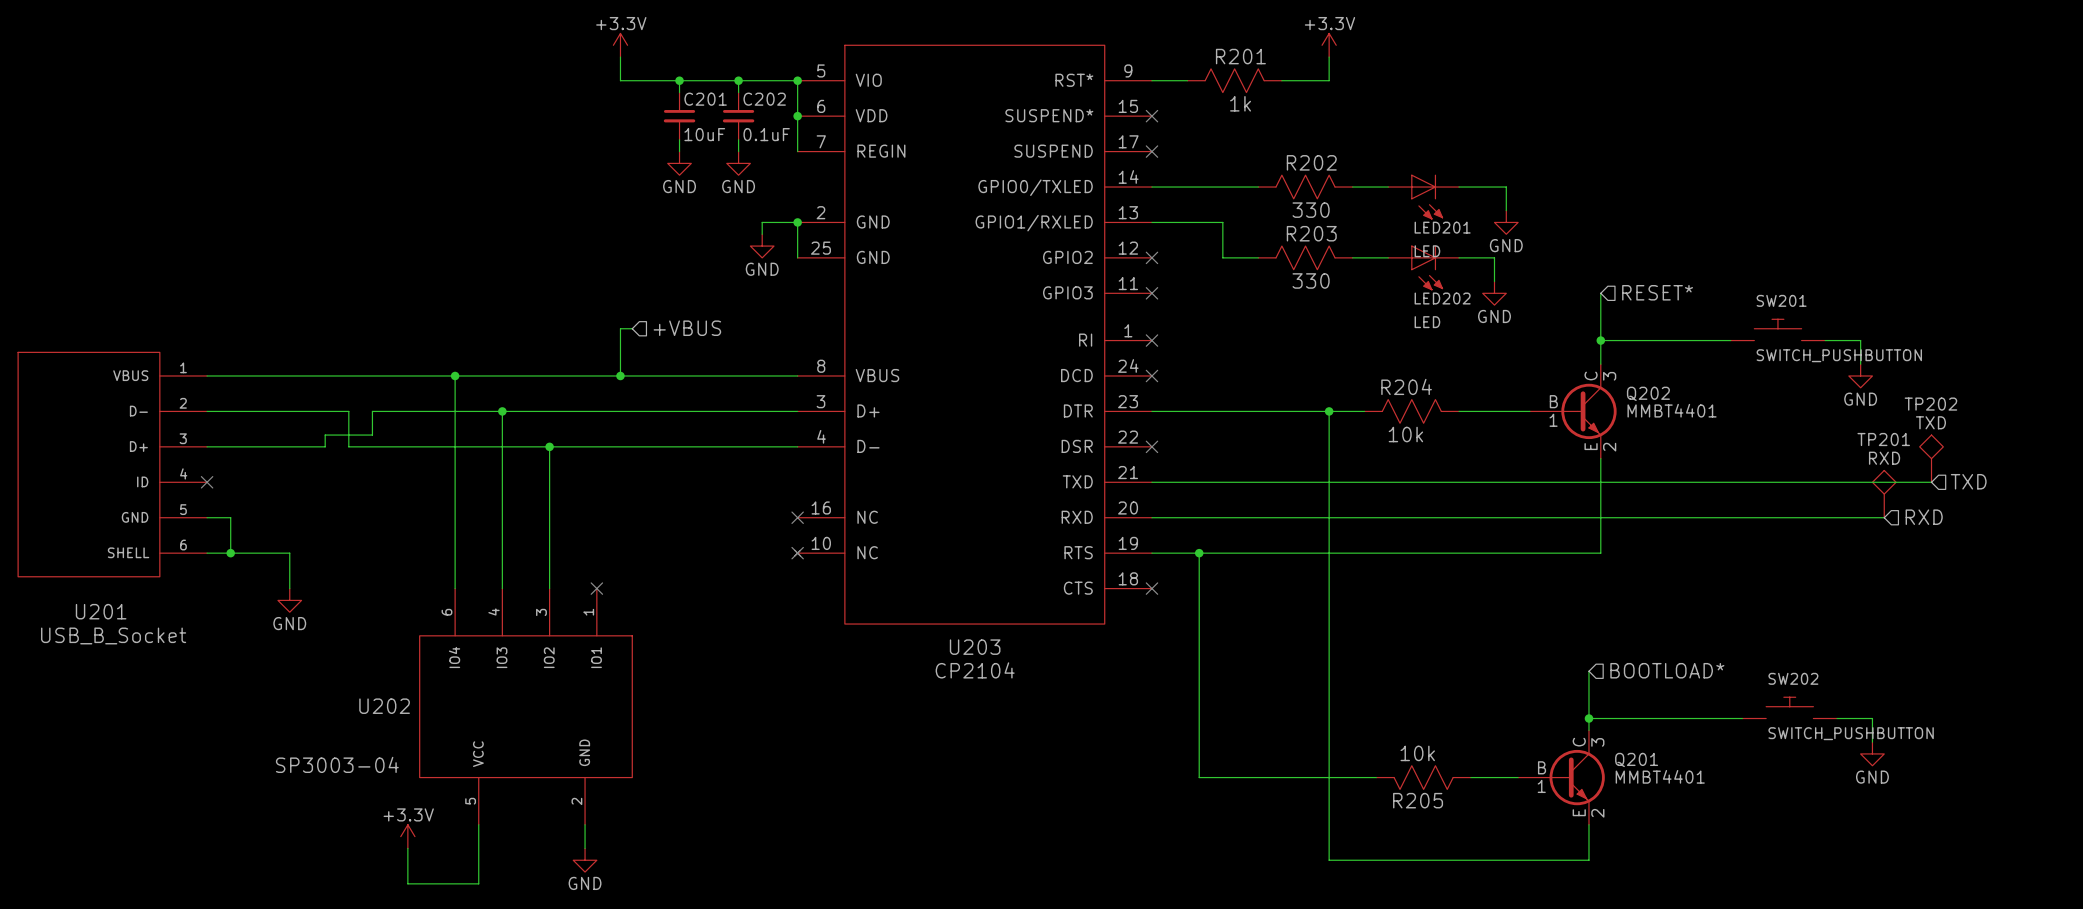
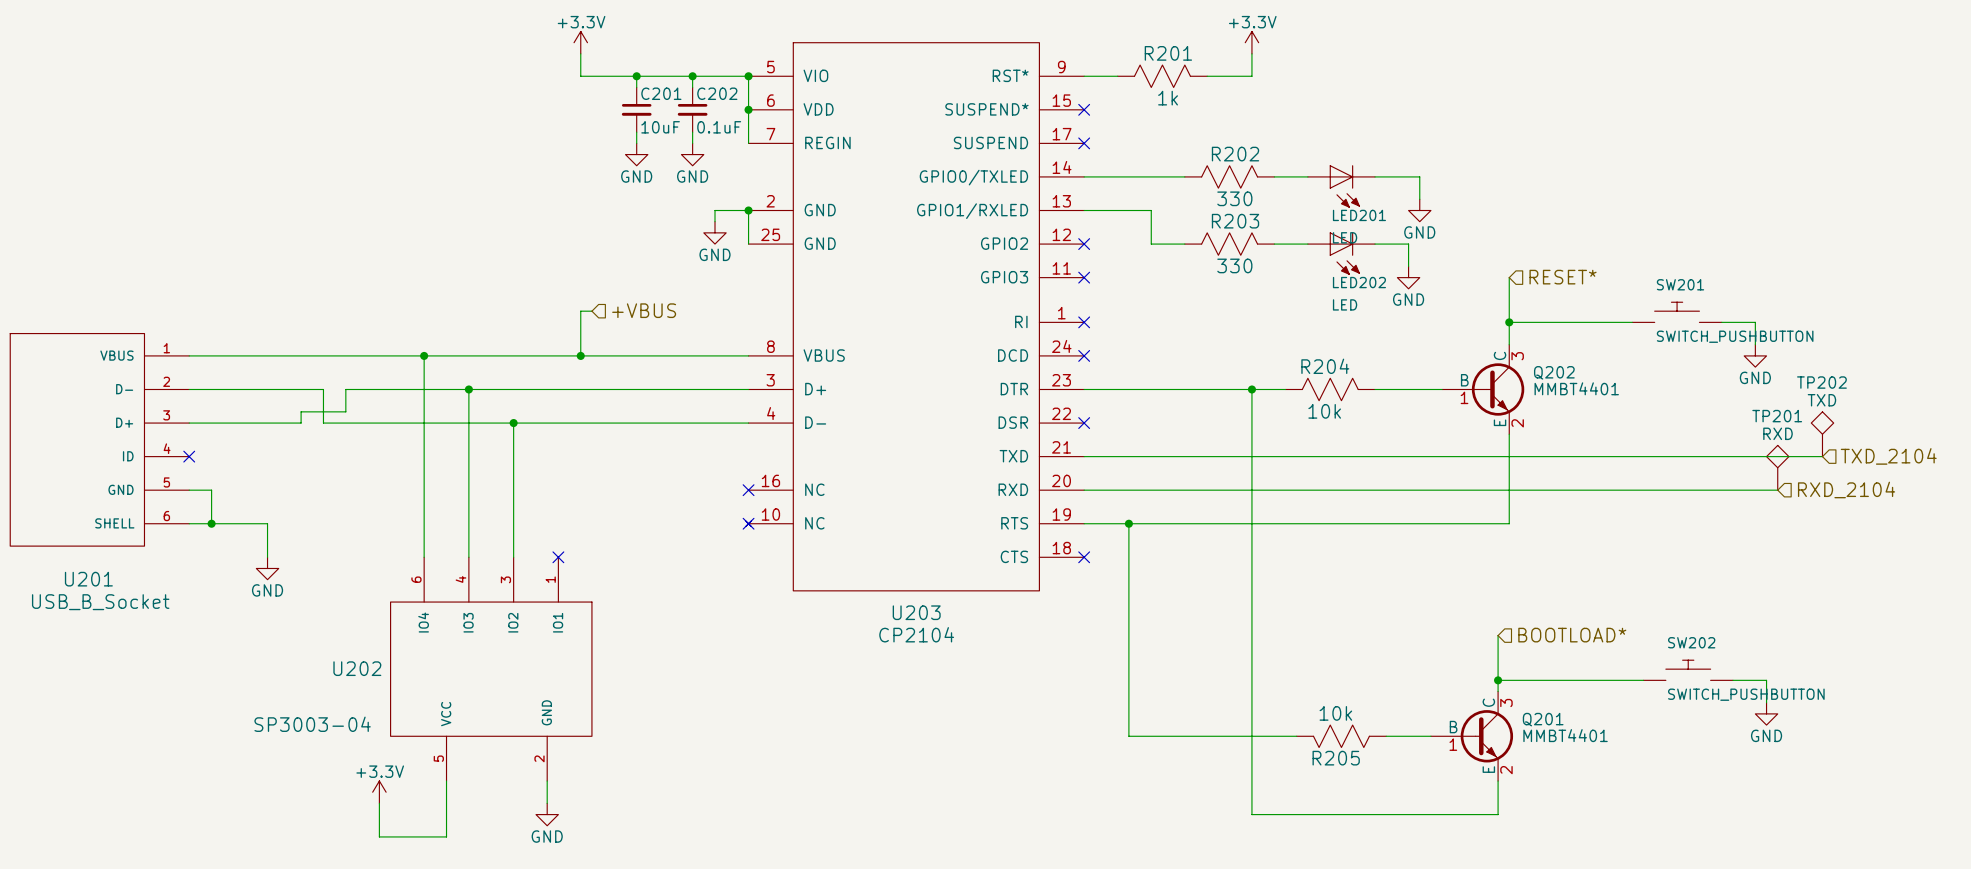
hierarchical label: TXD (1968, 481) -> TXD_2104 (1888, 456)
hierarchical label: RXD (1924, 517) -> RXD_2104 (1846, 489)

